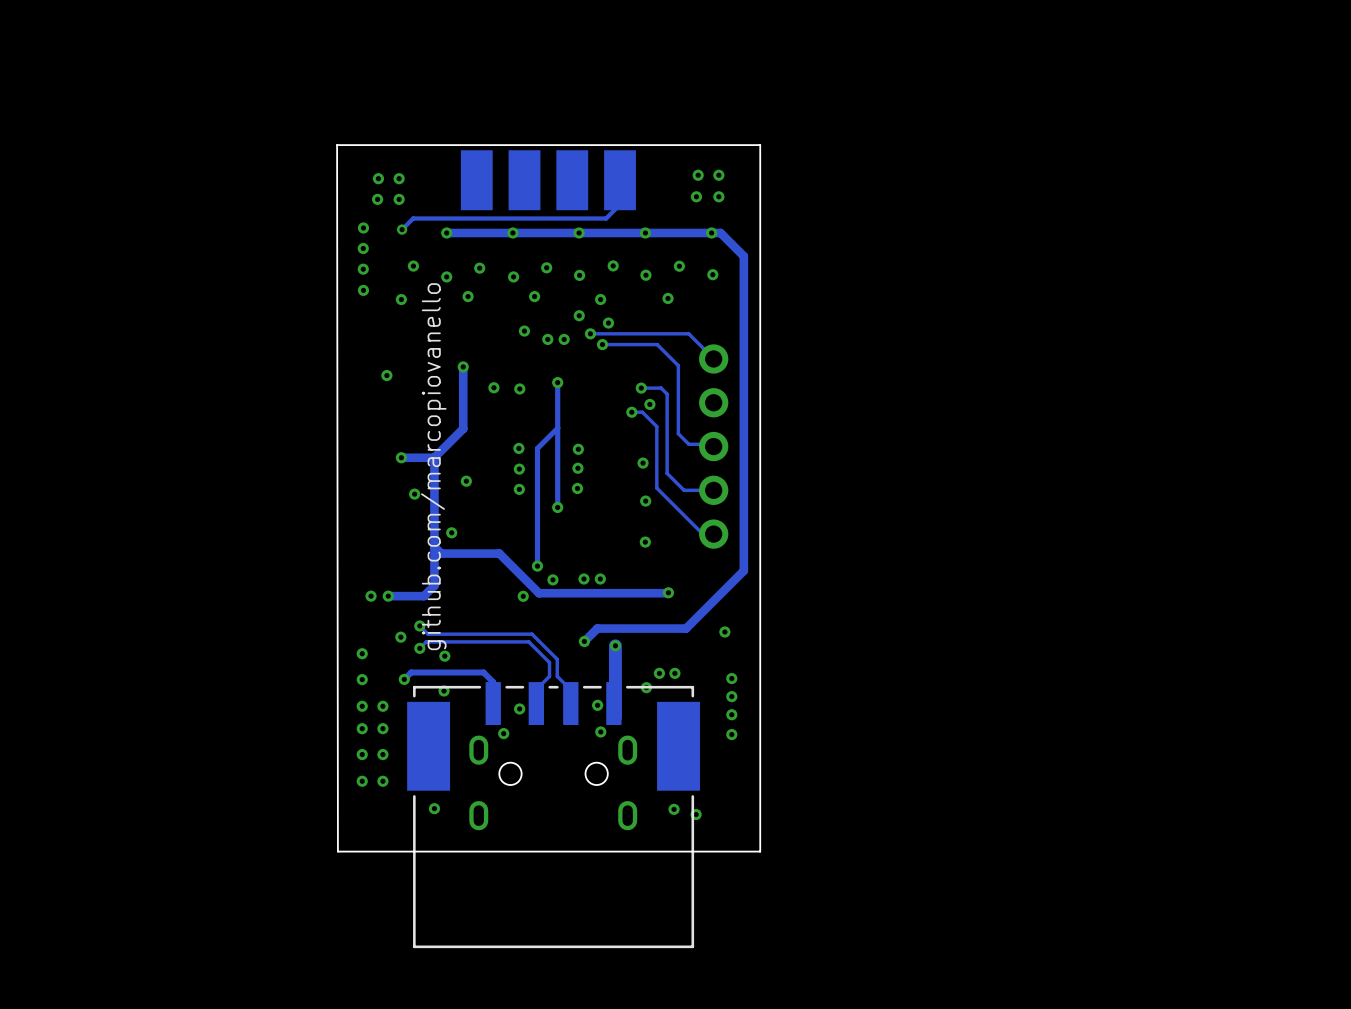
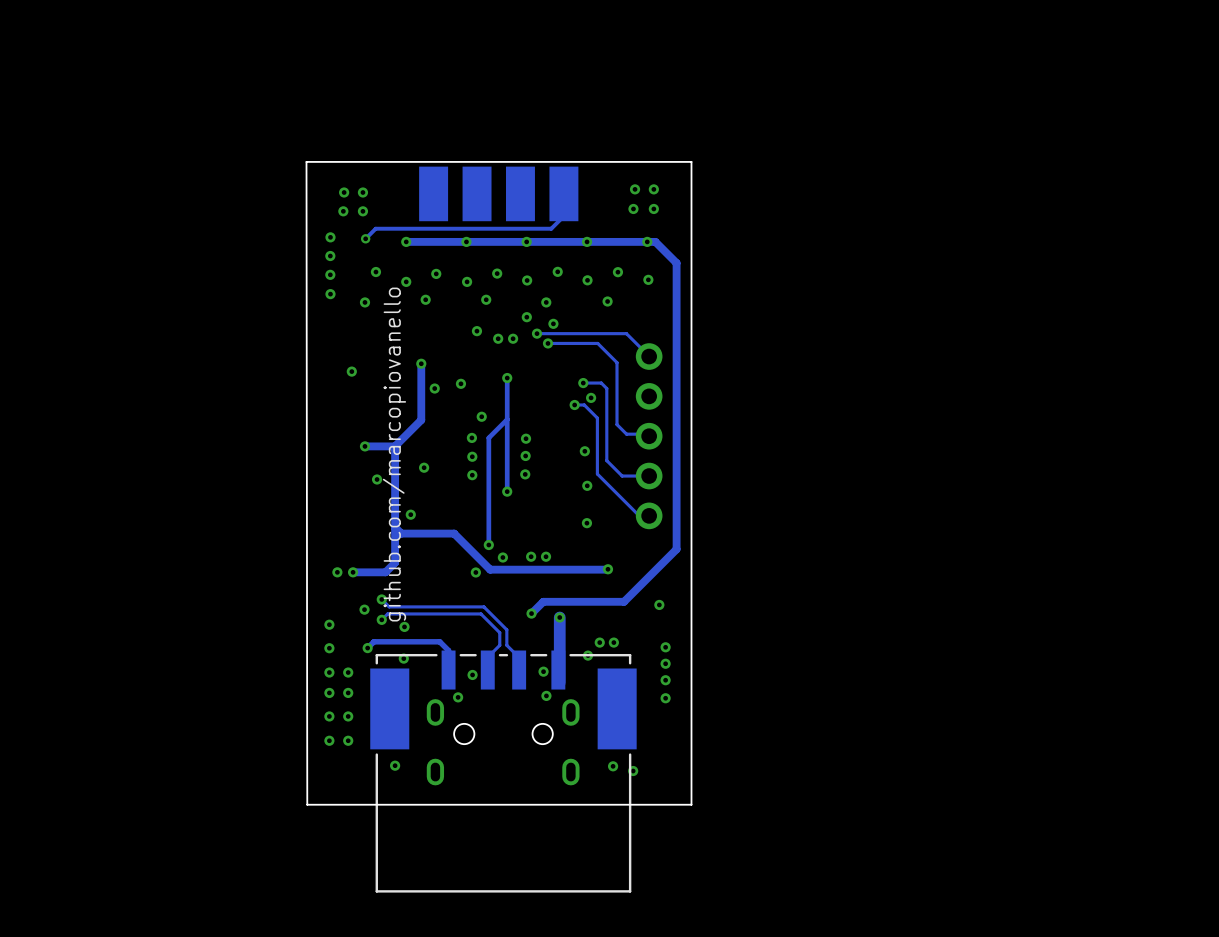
via: (493, 387) -> none
via: none -> (460, 383)
via: (519, 388) -> none
via: none -> (434, 388)
via: none -> (481, 416)

